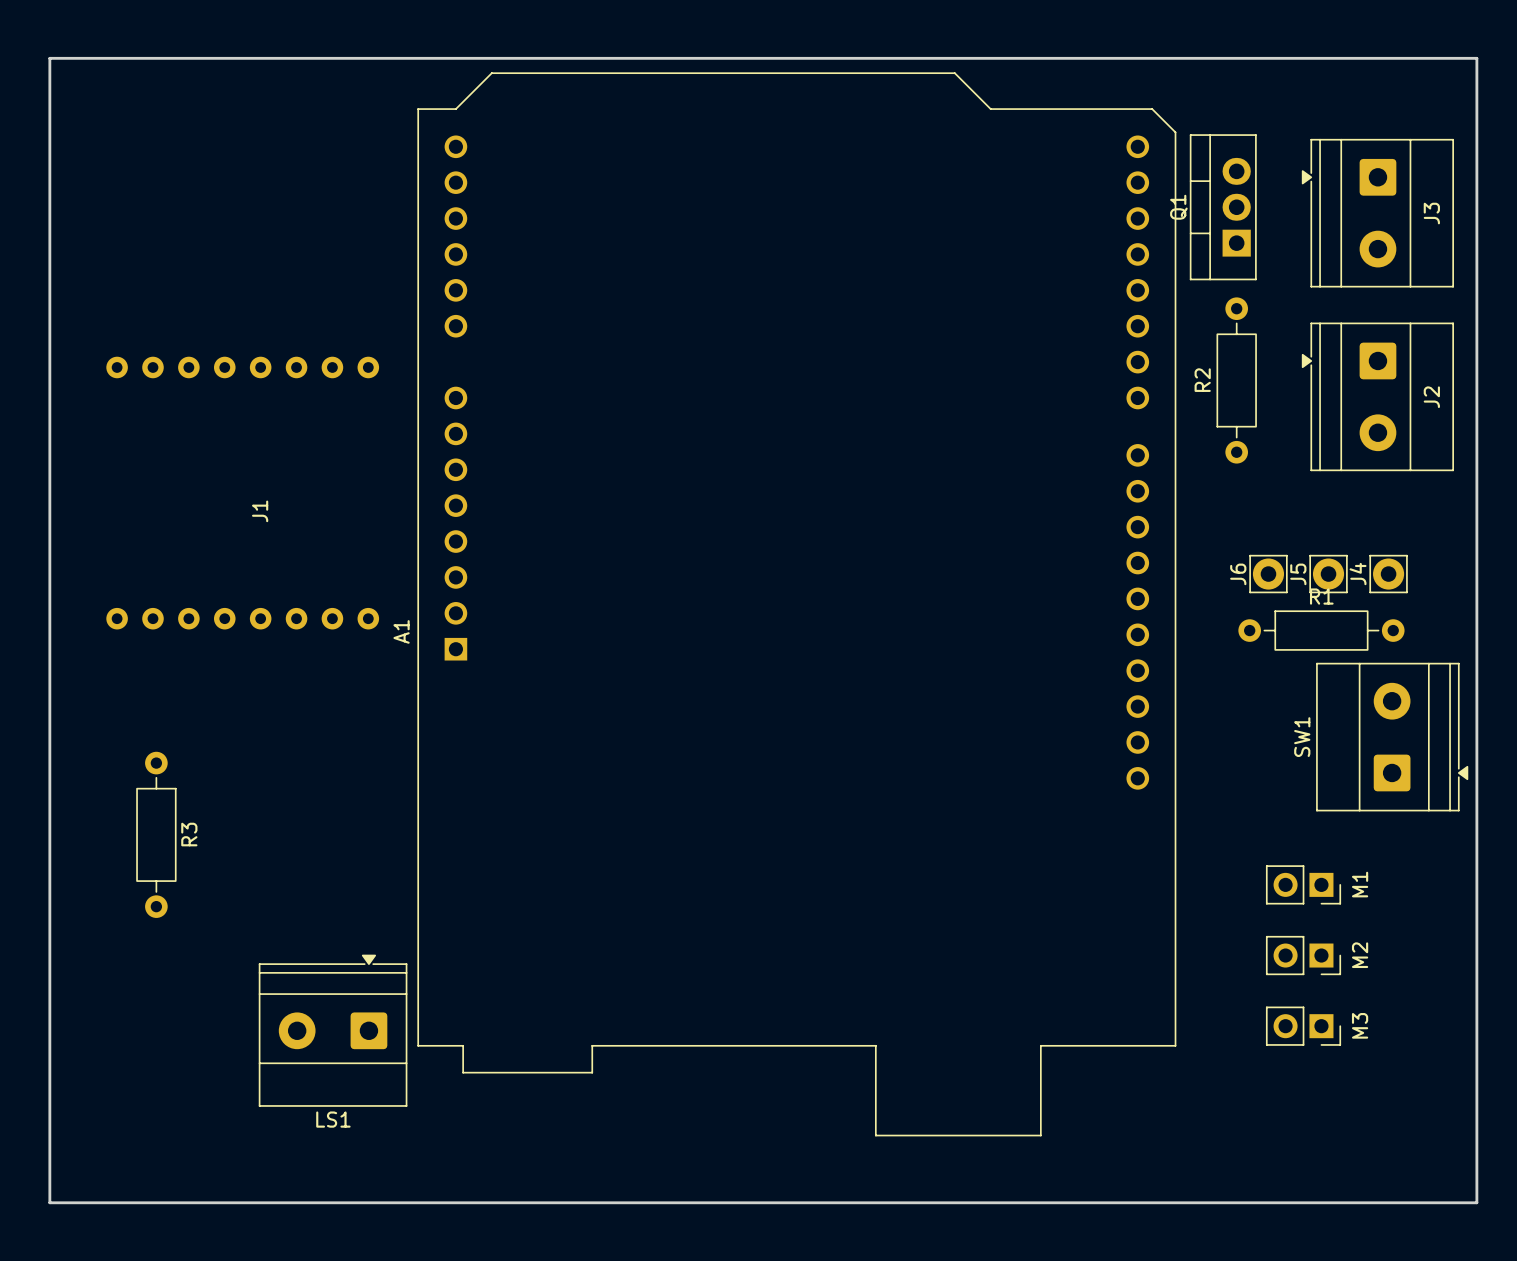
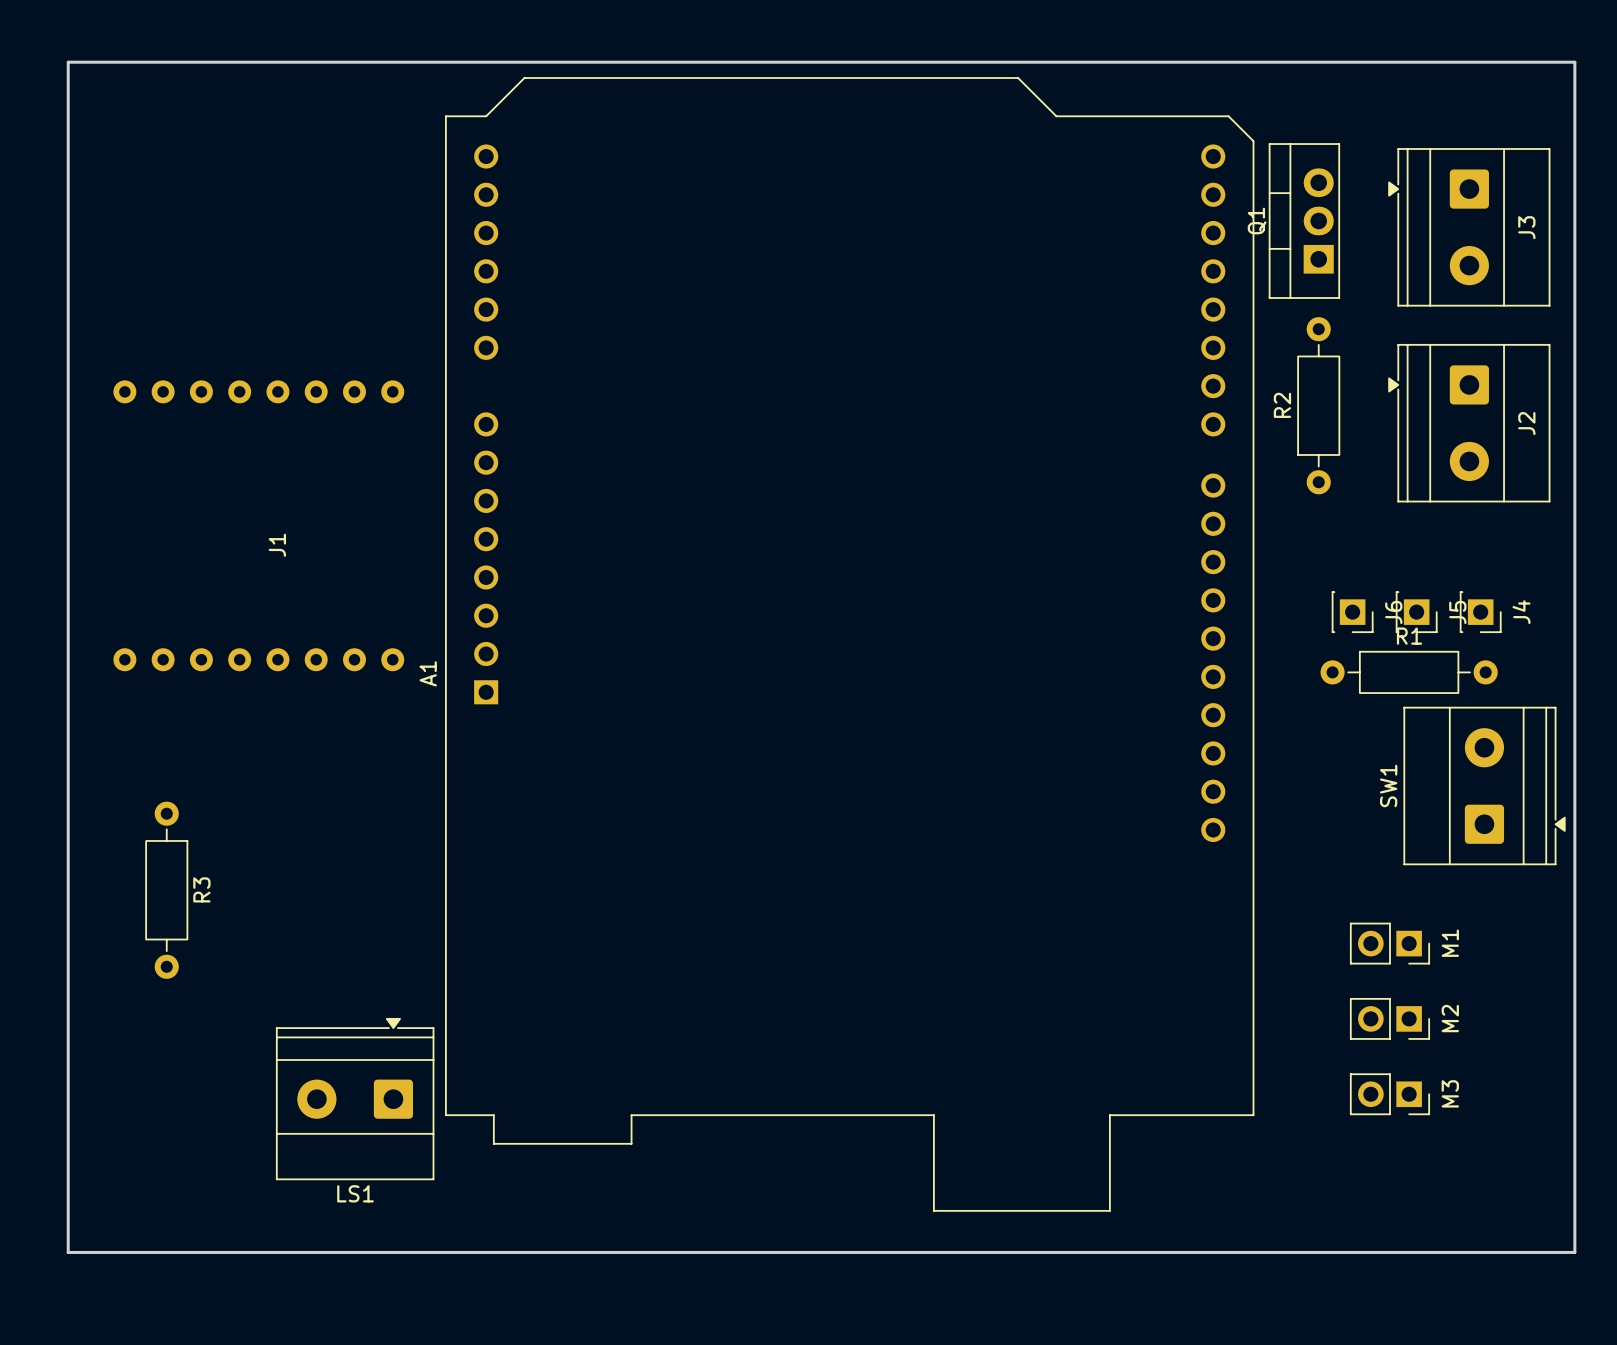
board edge: (63, 58) (49, 58) (49, 1202) (1476, 1202) (1476, 1174) -> (68, 62) (68, 1252) (1574, 1252)
J6 footprint: [1249, 554, 1288, 594] -> [1331, 591, 1374, 634]
J5 footprint: [1309, 554, 1348, 594] -> [1395, 591, 1438, 634]
J4 footprint: [1369, 554, 1408, 594] -> [1459, 591, 1502, 634]
J6 name position: J6 (1238, 574) -> J6 (1393, 612)
J5 name position: J5 (1298, 574) -> J5 (1457, 612)
J4 name position: J4 (1358, 574) -> J4 (1521, 612)

